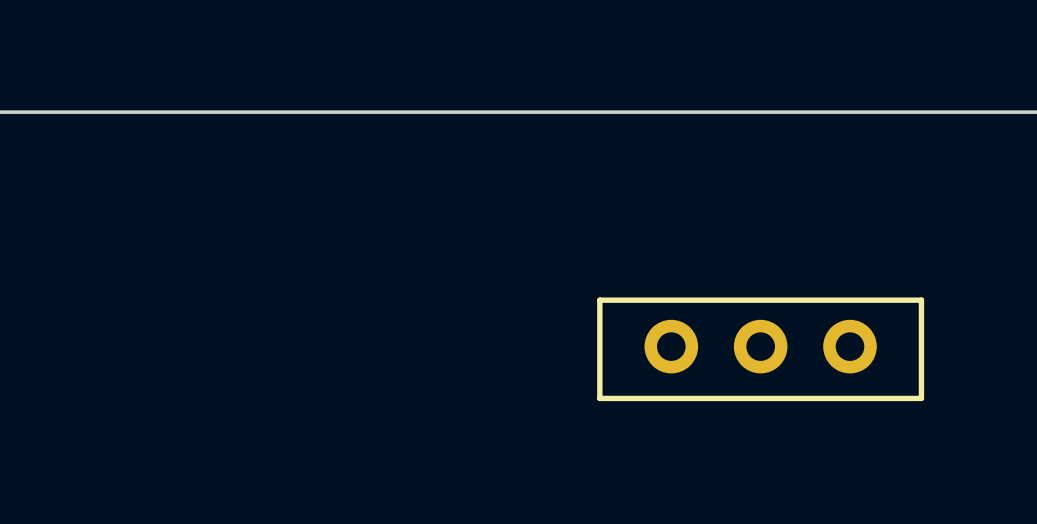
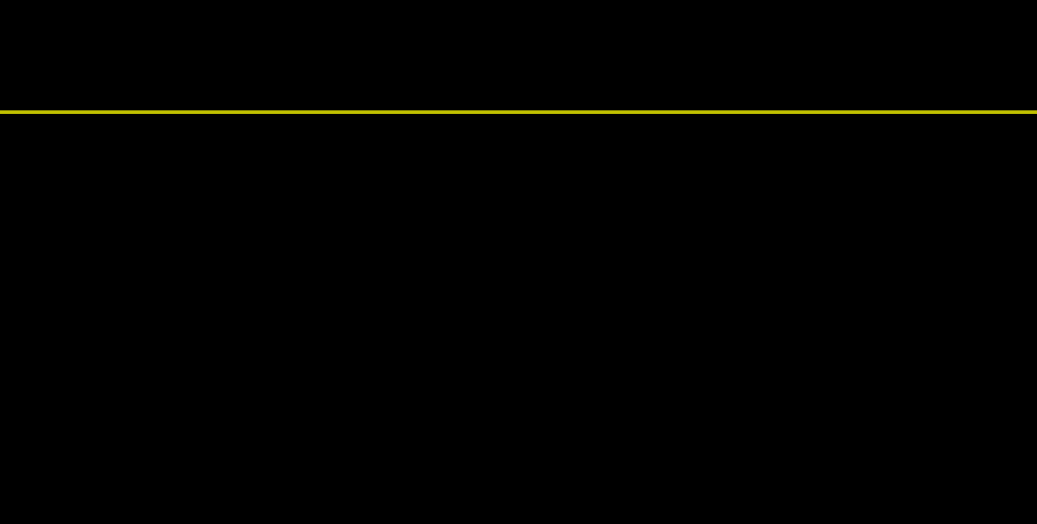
part: (760, 349) -> none

